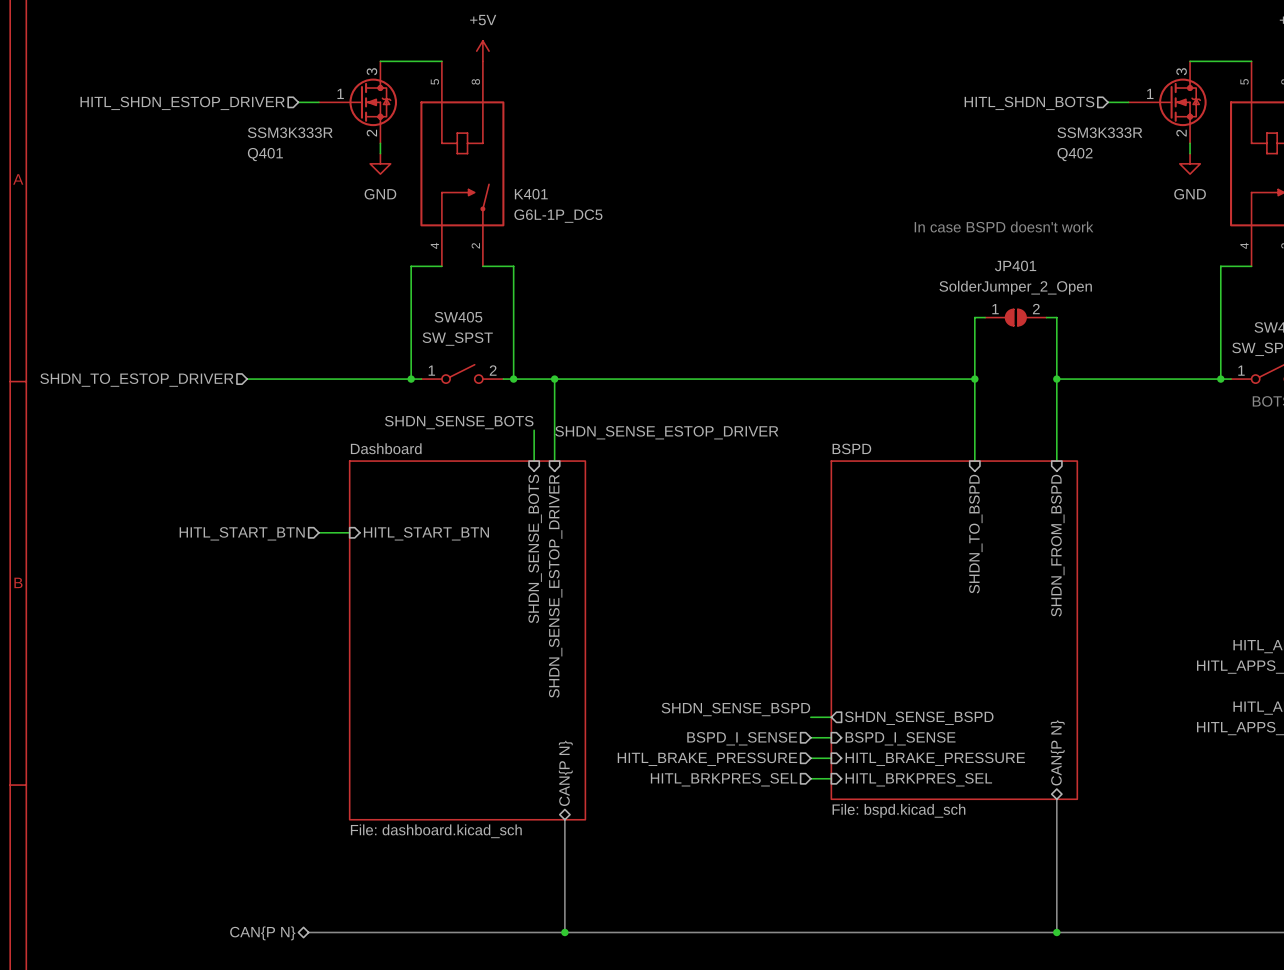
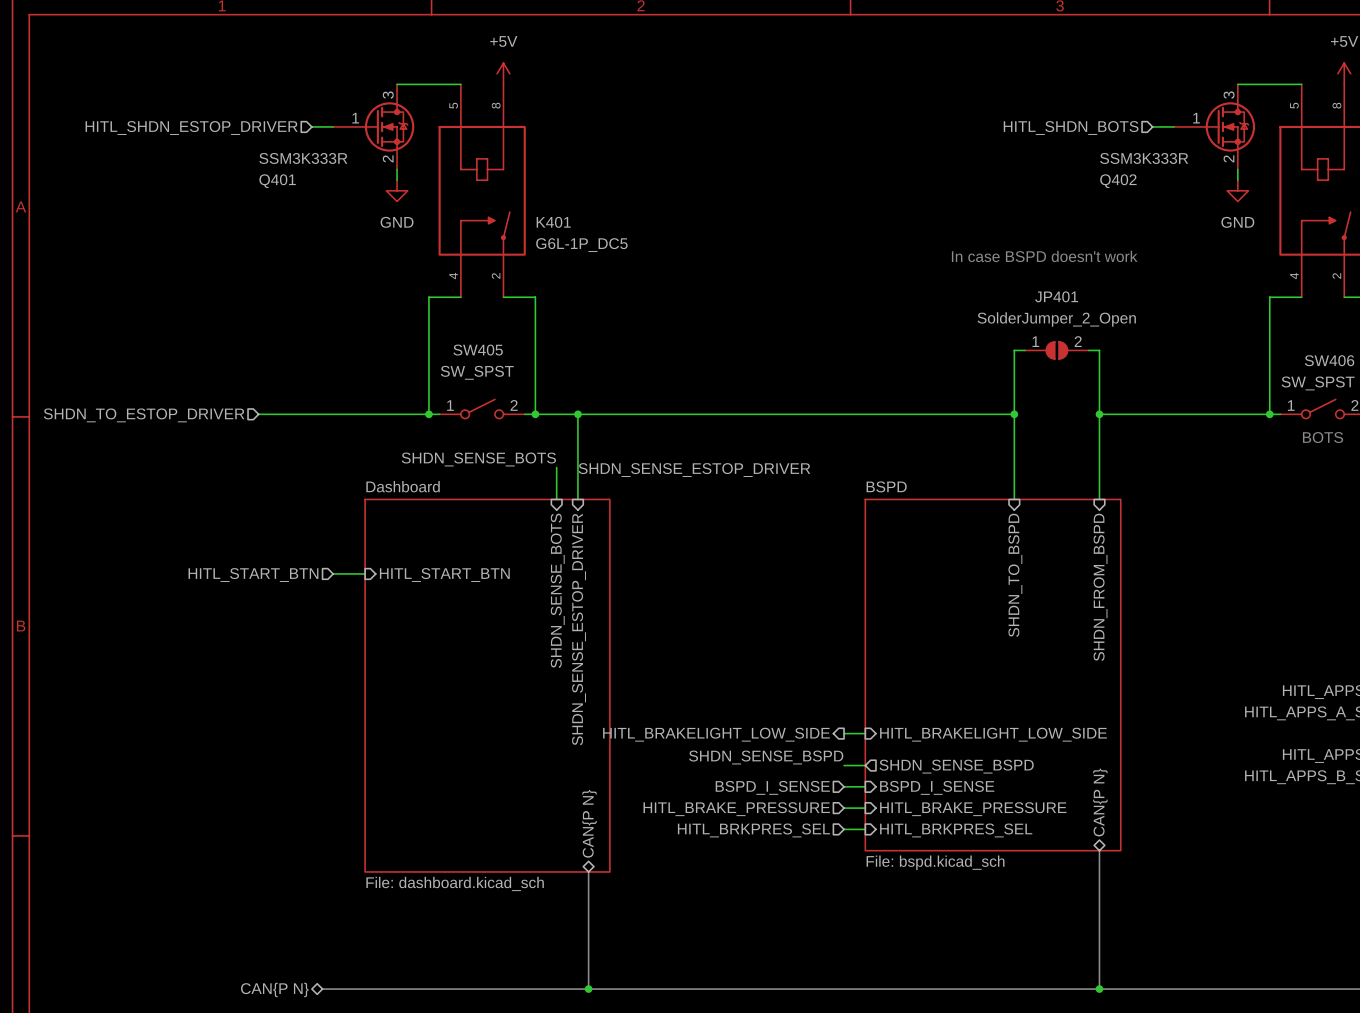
wire: none -> (844, 733) (865, 733)
hierarchical label: none -> HITL_BRAKELIGHT_LOW_SIDE (716, 734)
sheet pin: none -> HITL_BRAKELIGHT_LOW_SIDE (993, 734)

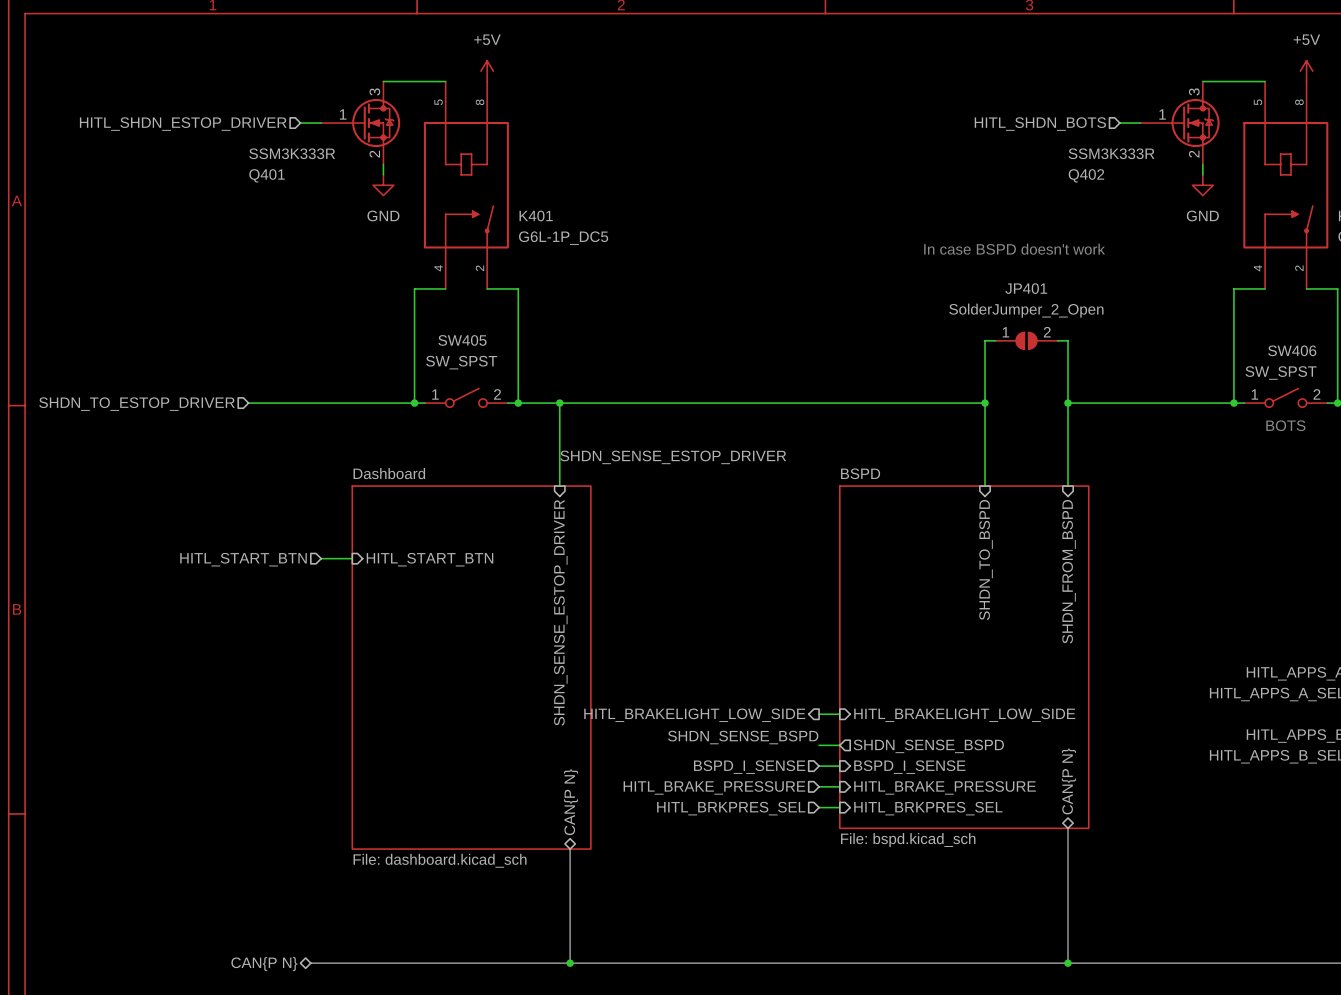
label: SHDN_SENSE_BOTS (478, 459) -> none
wire: (556, 467) (556, 499) -> none
sheet pin: SHDN_SENSE_BOTS (557, 590) -> none

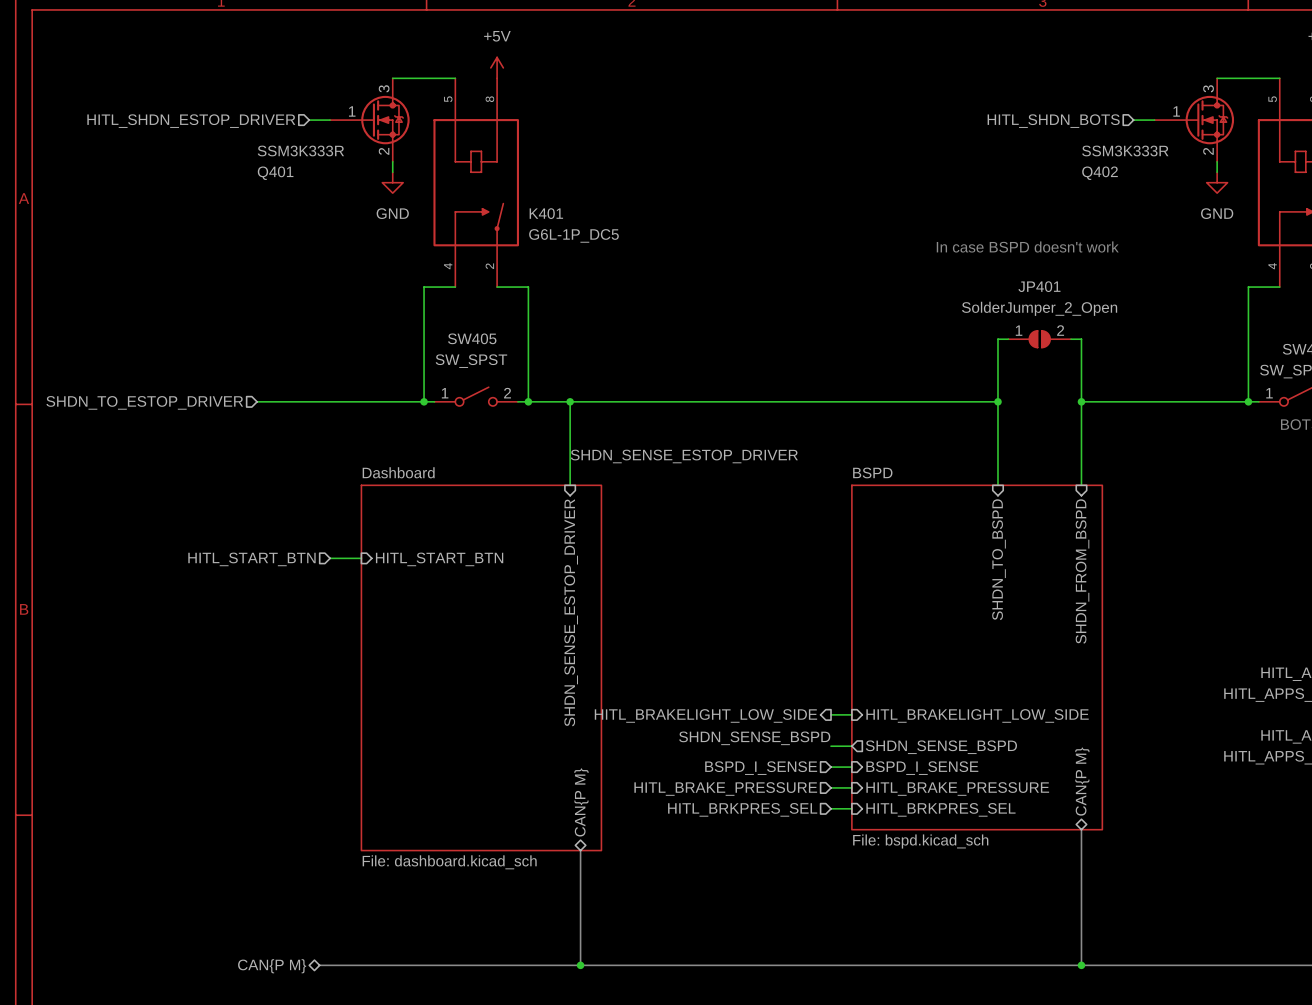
sheet pin: CAN{P N} (1068, 781) -> CAN{P M} (1082, 781)
sheet pin: CAN{P N} (571, 802) -> CAN{P M} (581, 802)
hierarchical label: CAN{P N} (264, 964) -> CAN{P M} (272, 966)

